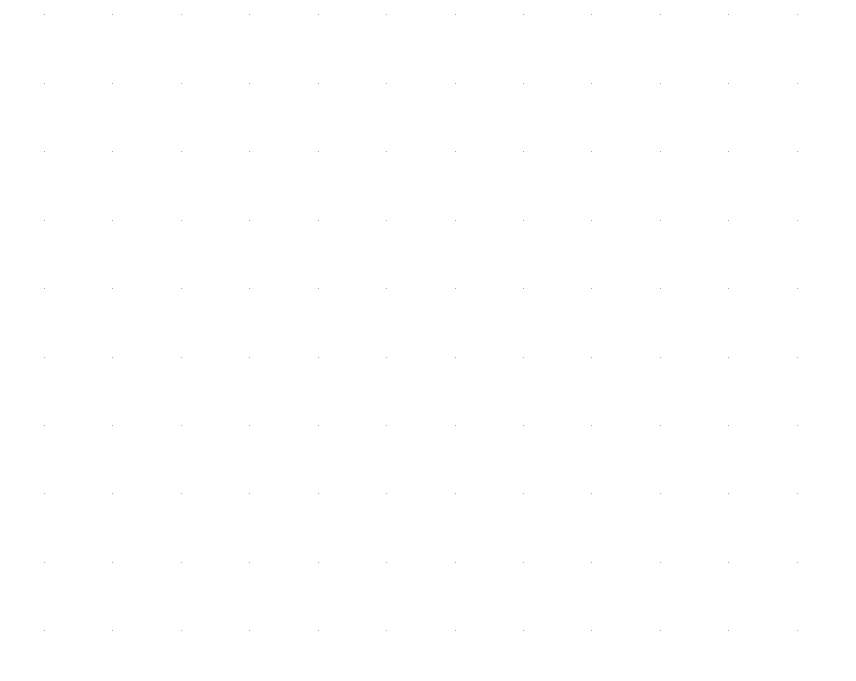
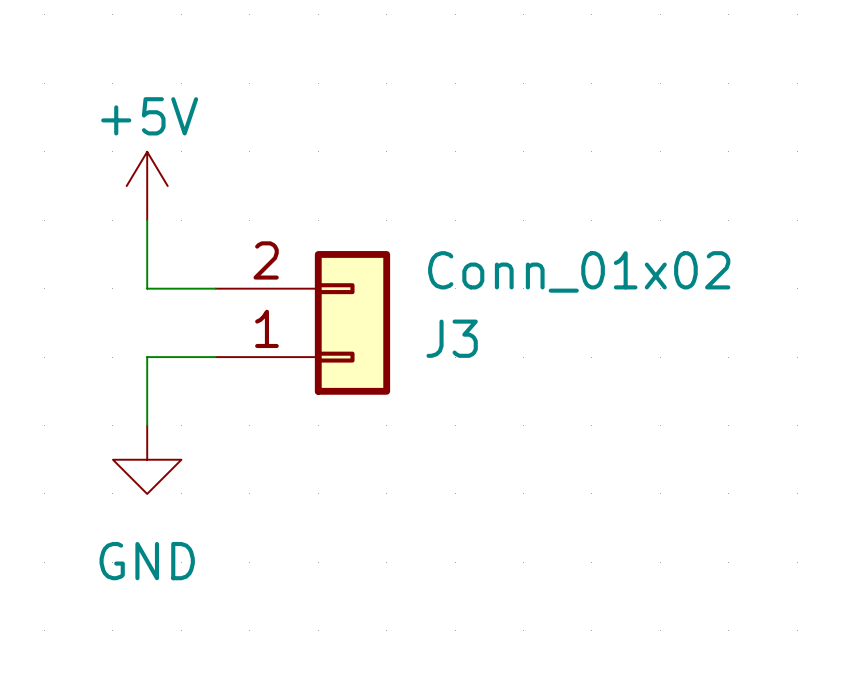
power symbol: none -> +5V (147, 186)
wire: none -> (147, 220) (147, 288) (215, 288)
J3: none -> Conn_01x02 (302, 322)
wire: none -> (215, 357) (147, 357) (147, 425)
power symbol: none -> GND (147, 459)

